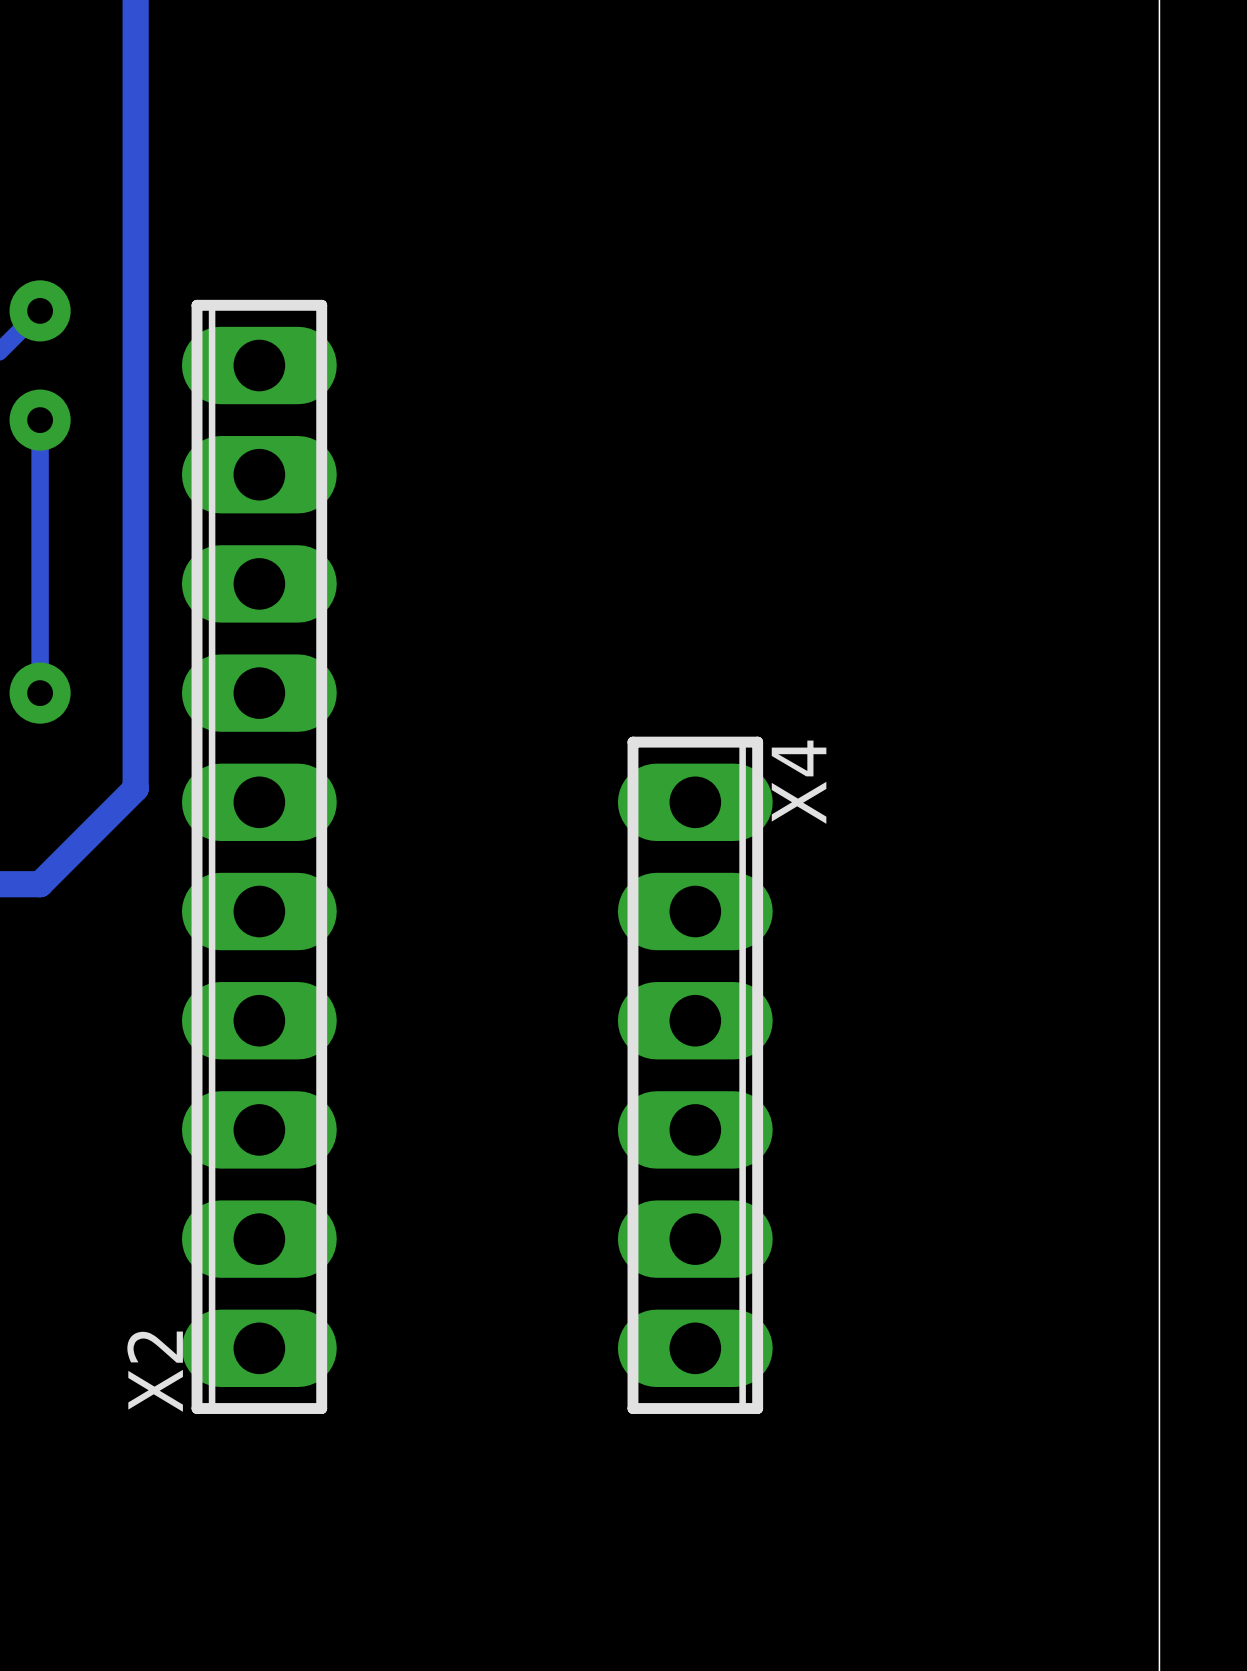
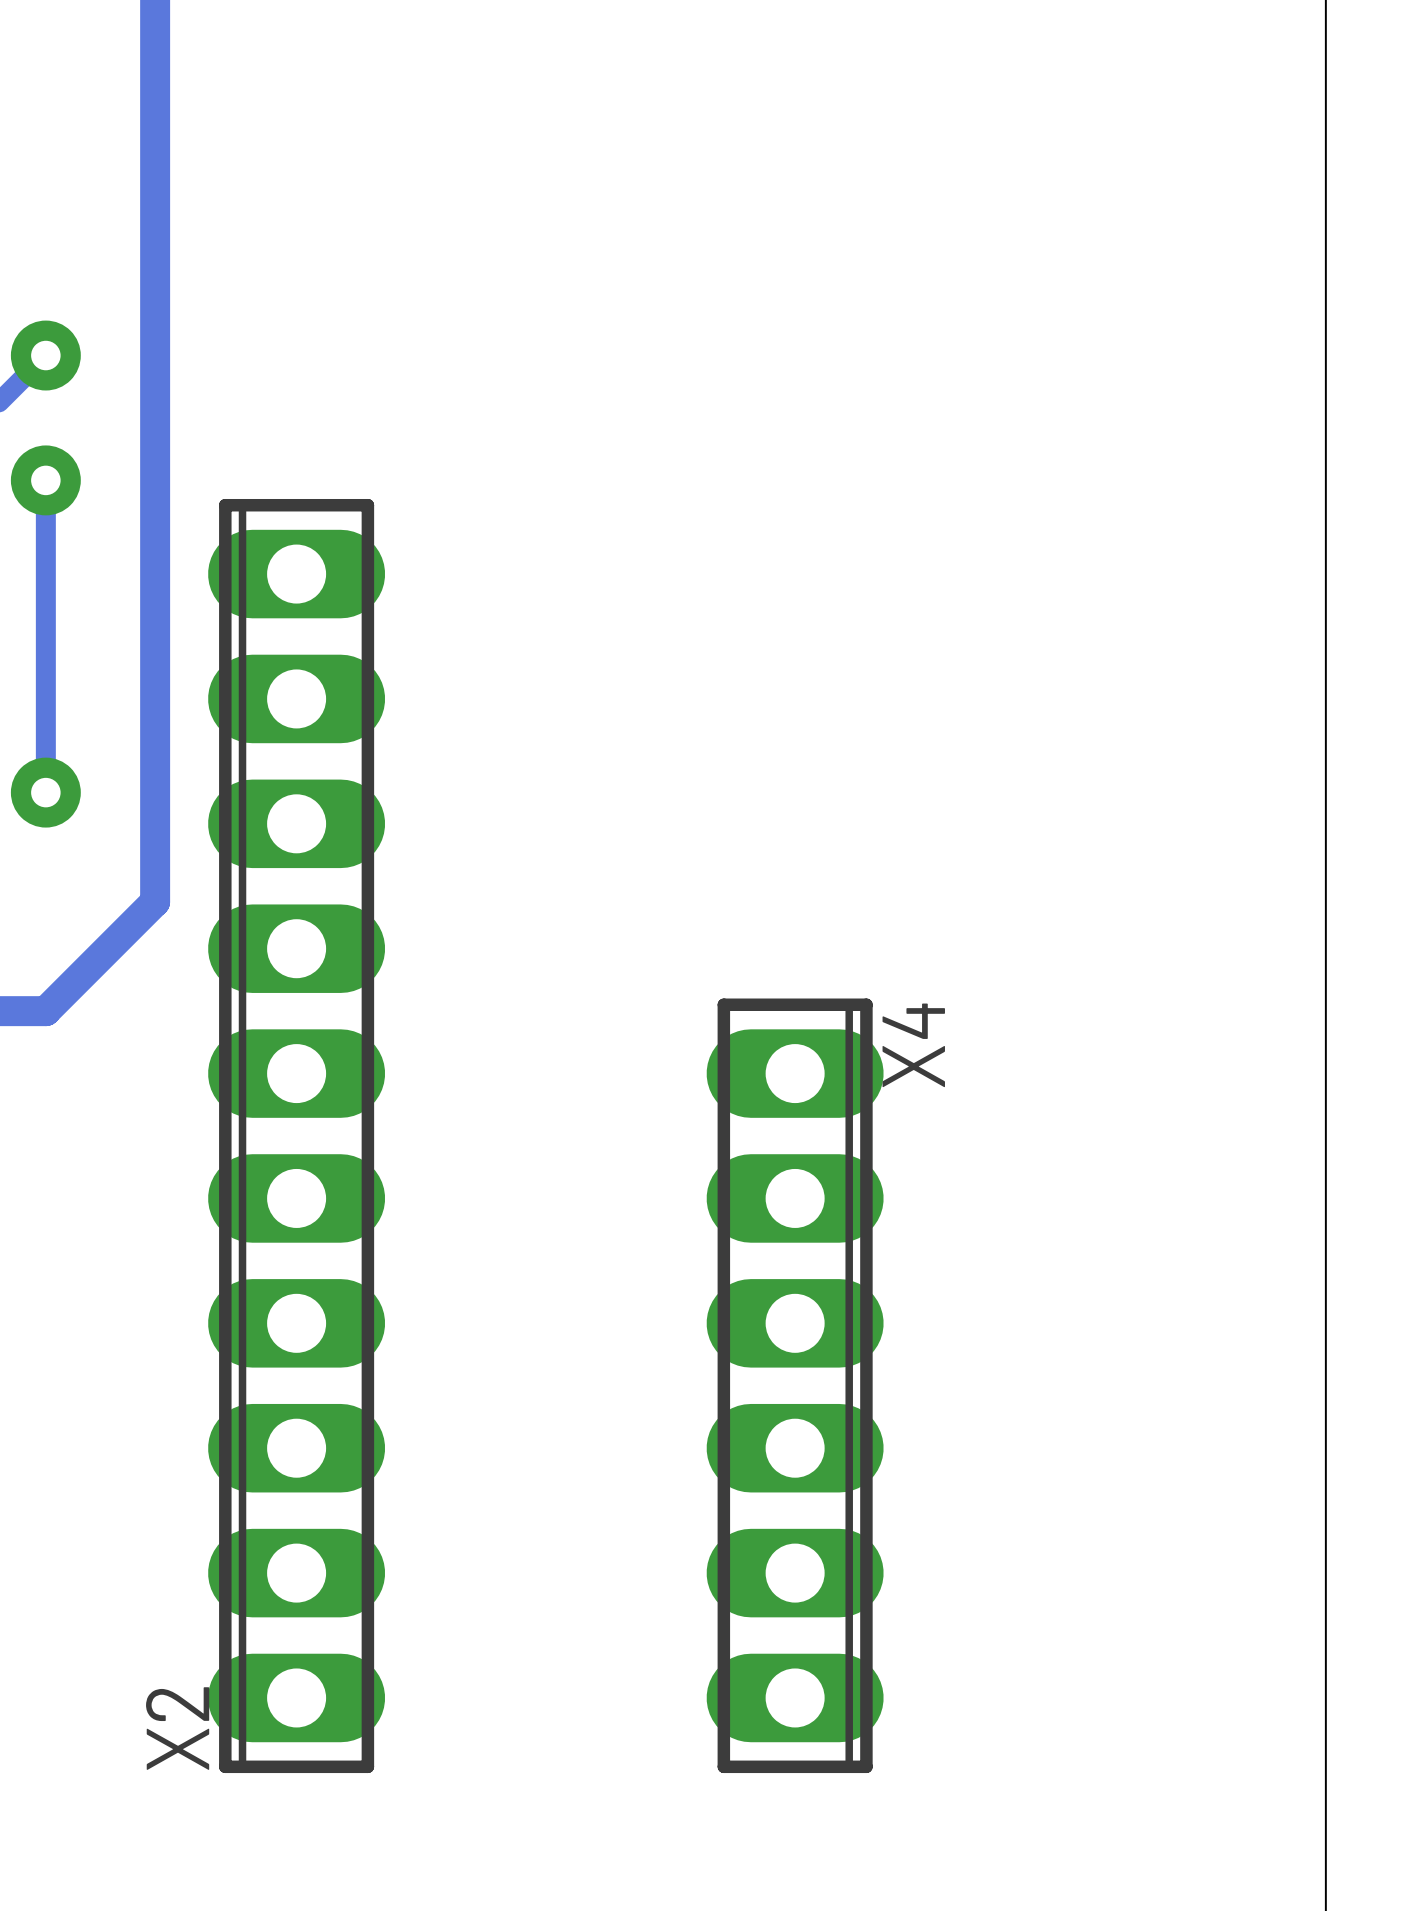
X2 position: (259, 856) -> (296, 1136)
X4 position: (695, 1075) -> (795, 1385)

